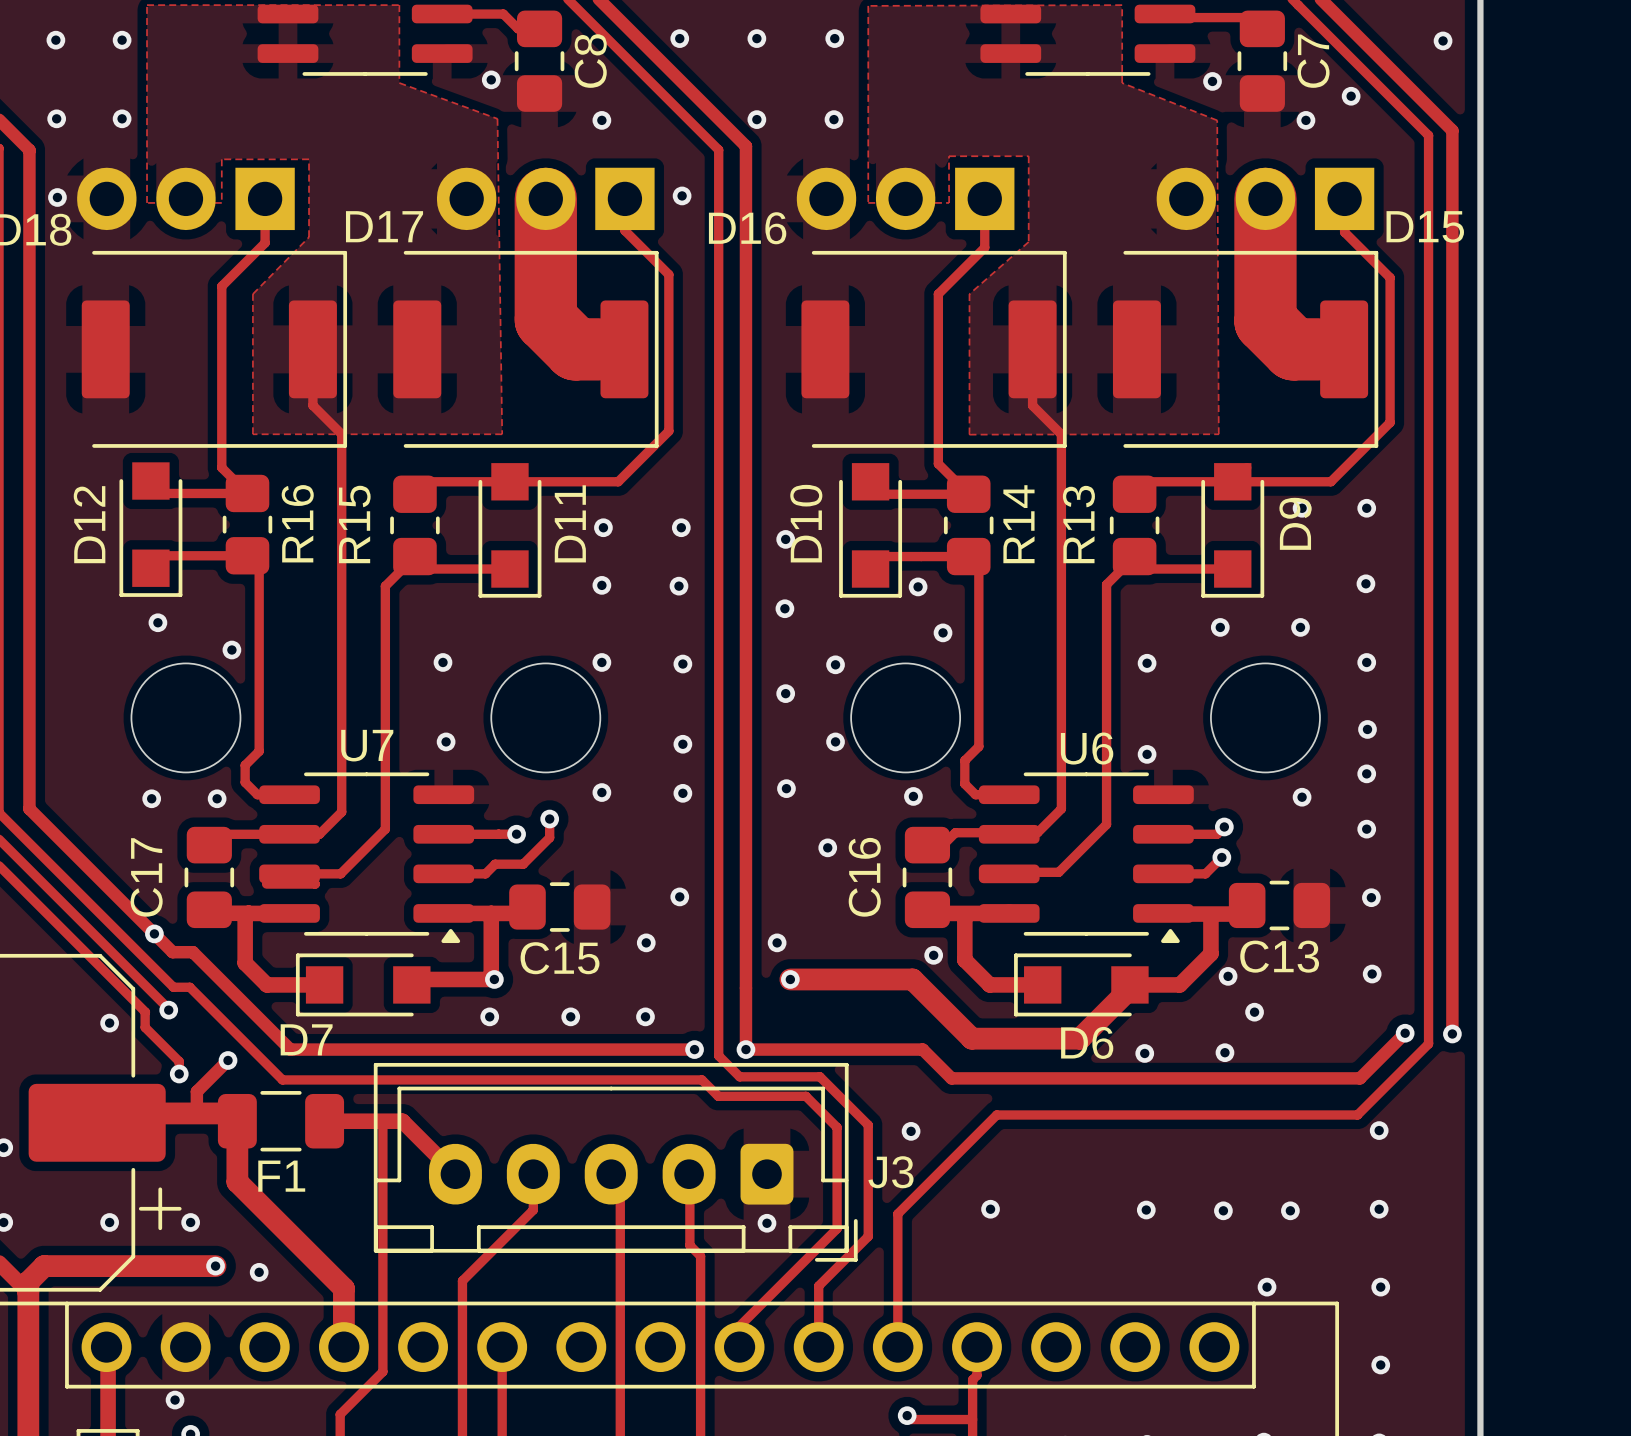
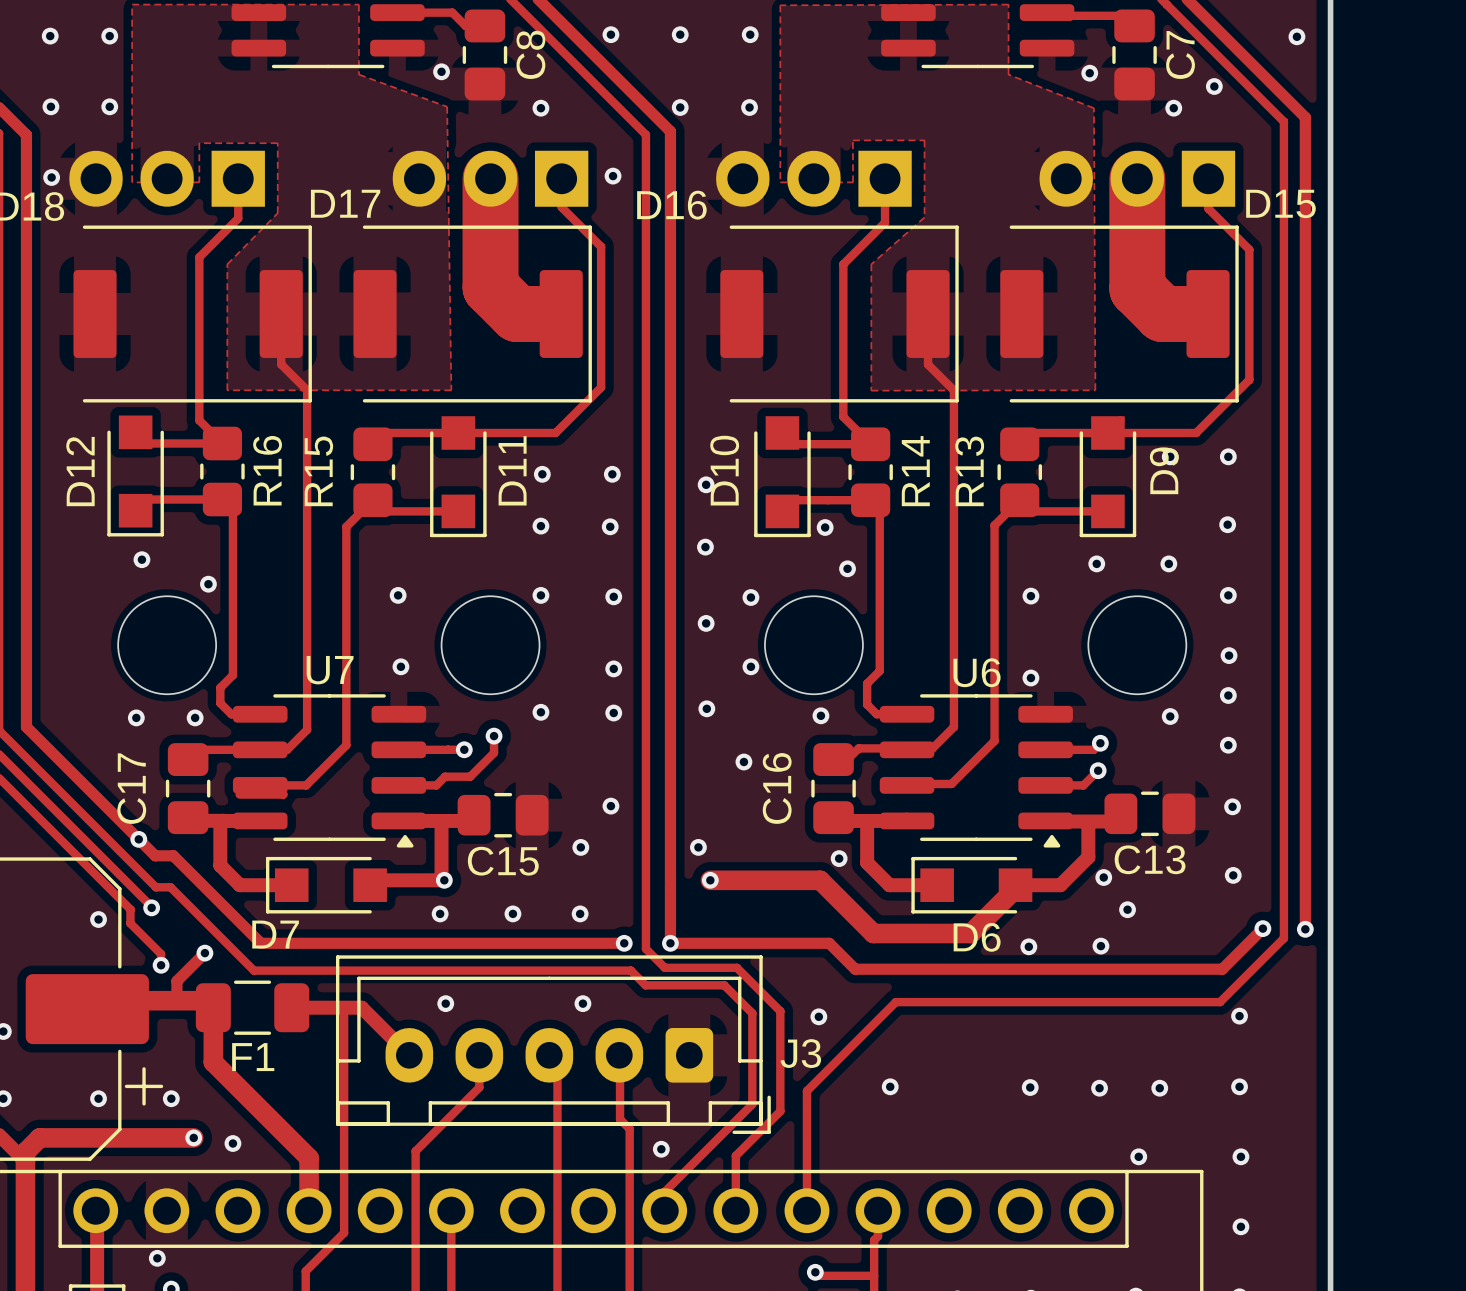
via: none -> (445, 1003)
via: none -> (582, 1003)
via position: (766, 1223) -> (661, 1149)

